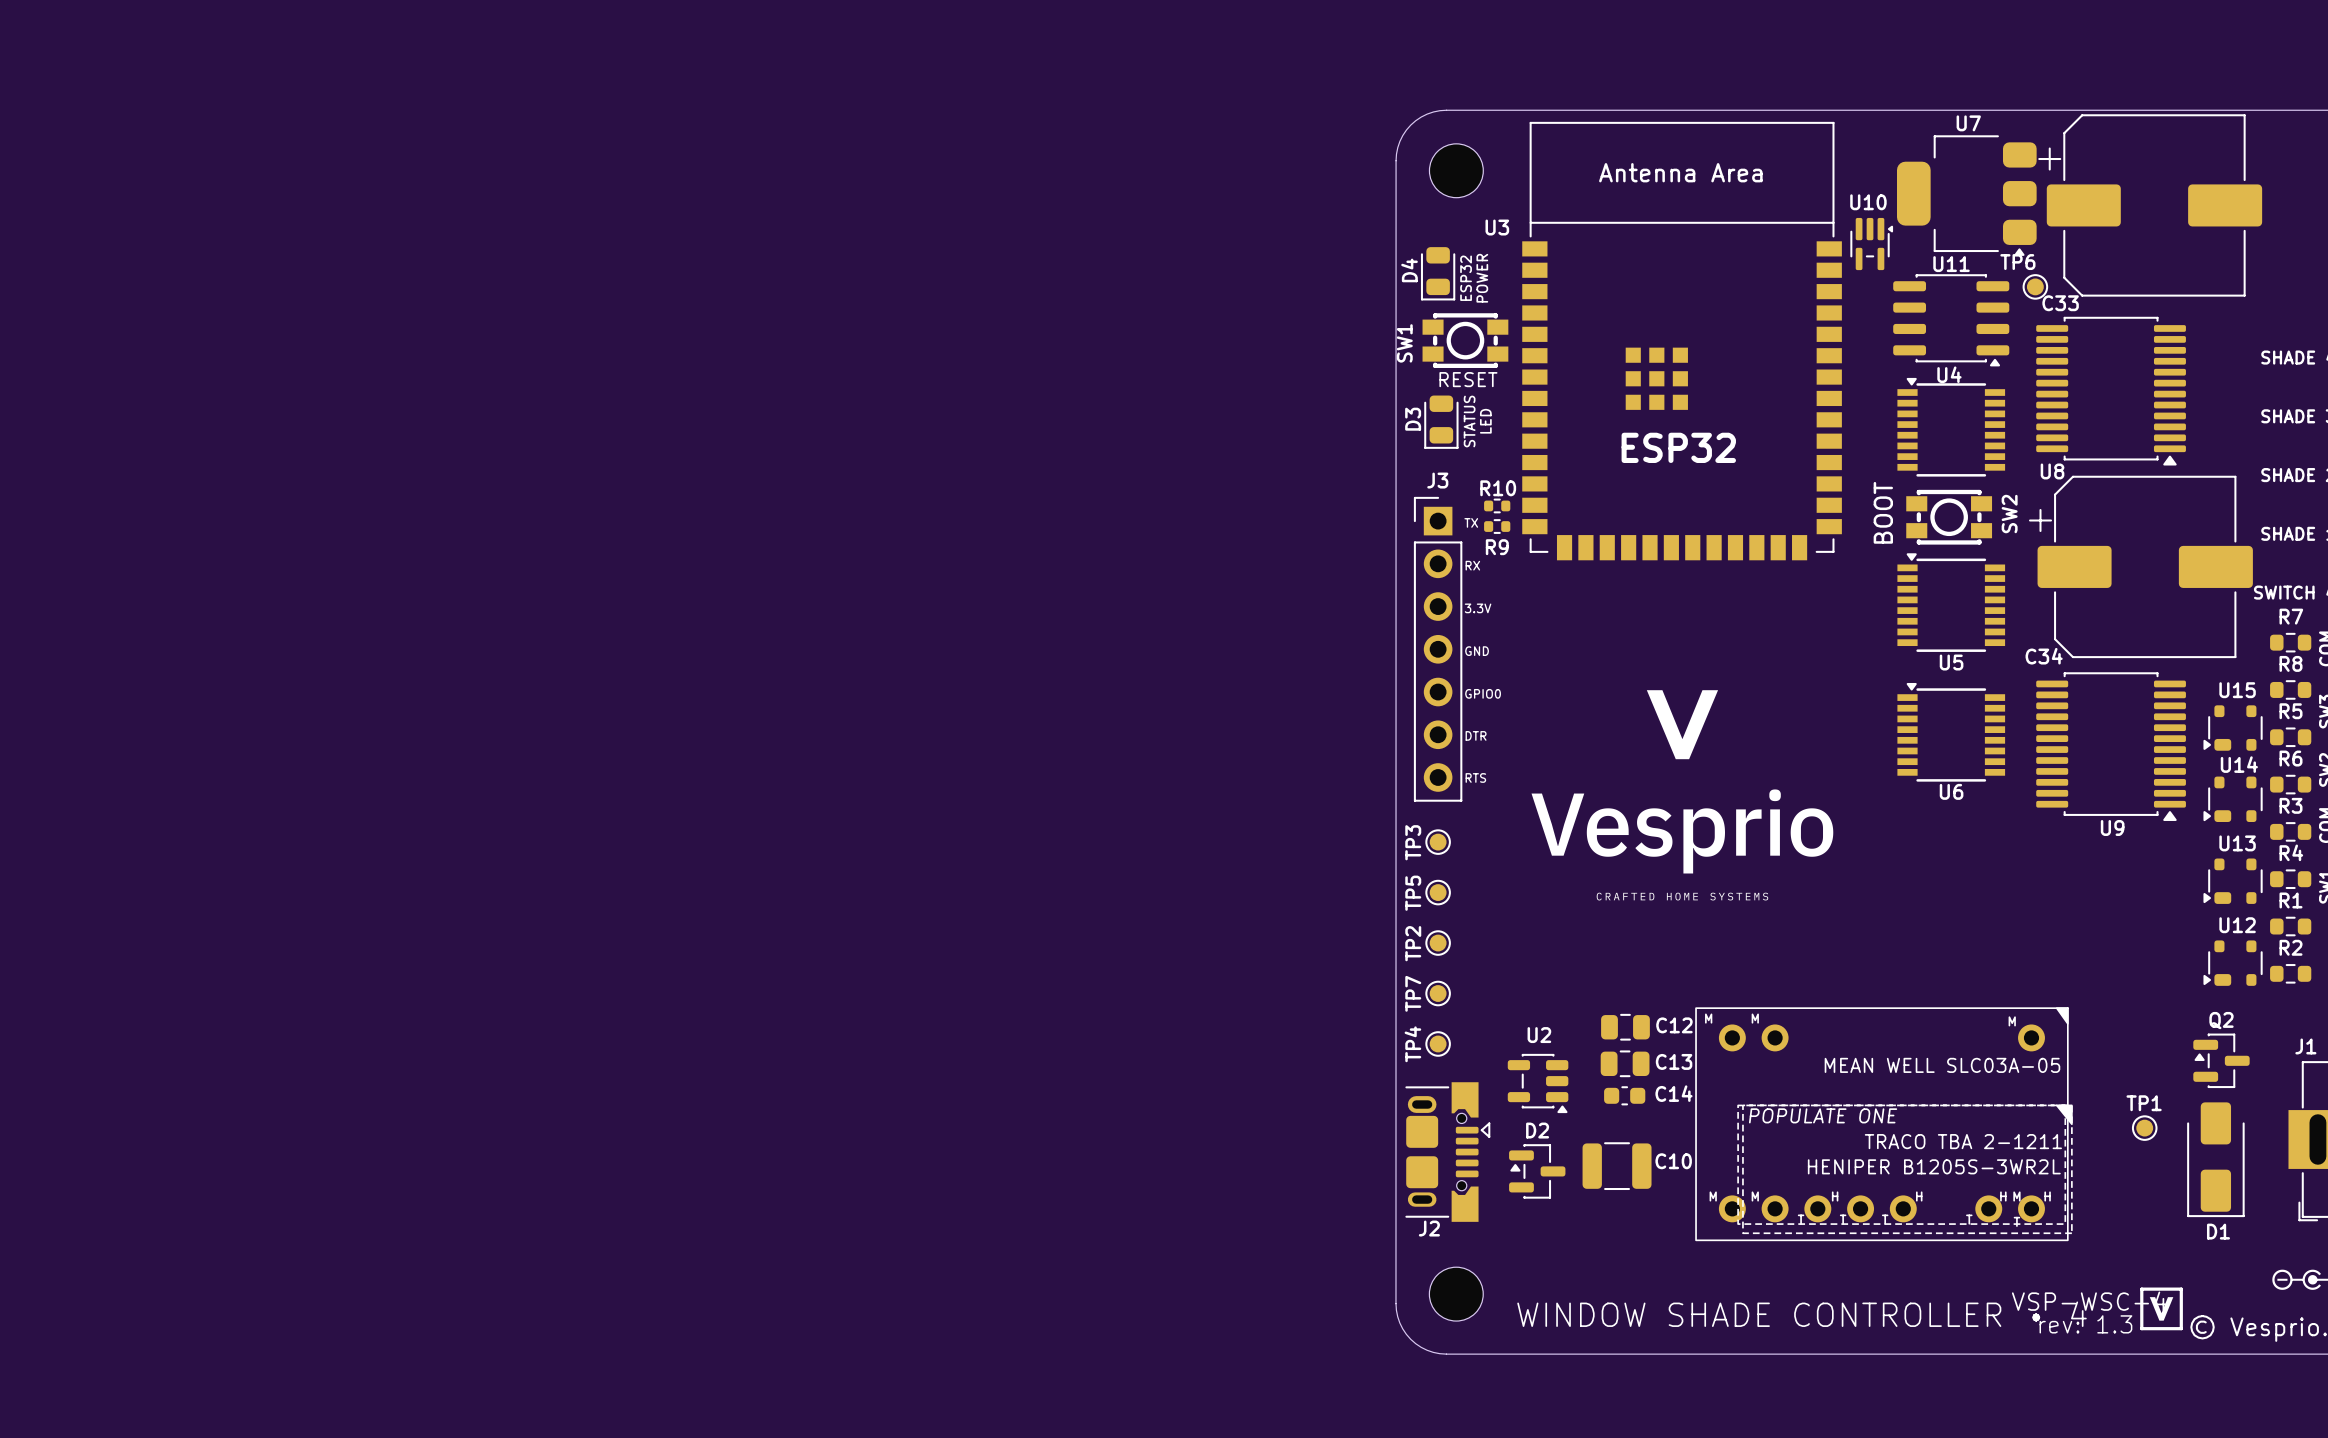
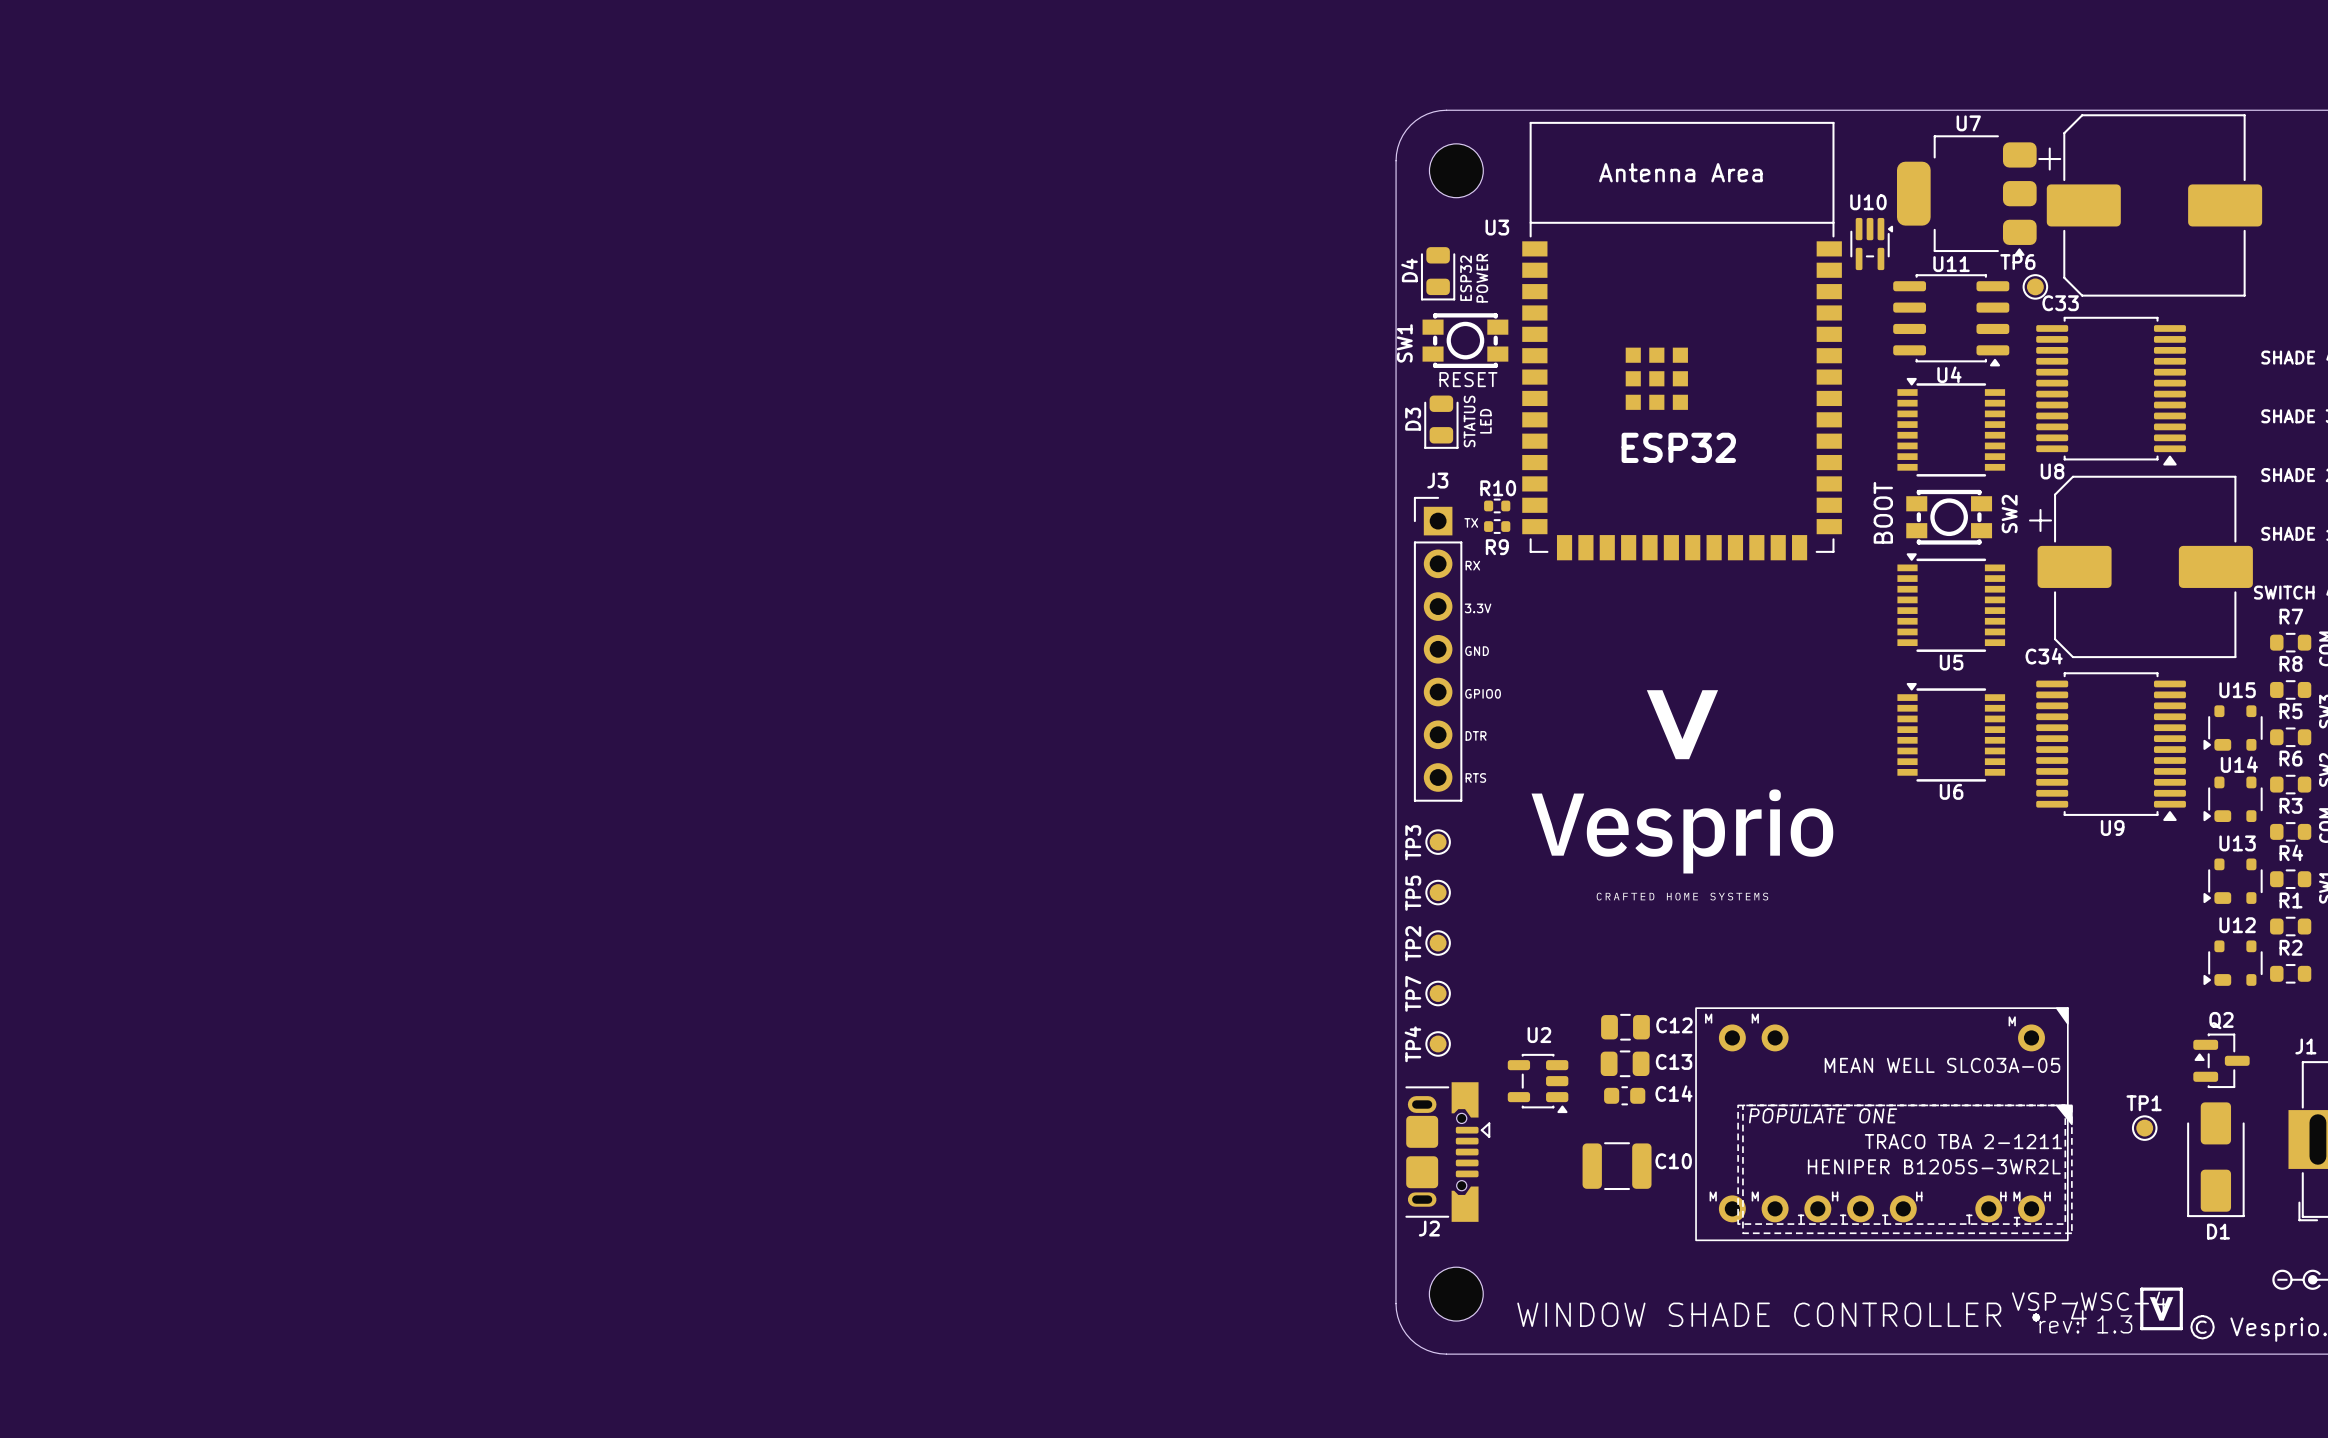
D2: (1537, 1171) -> none

